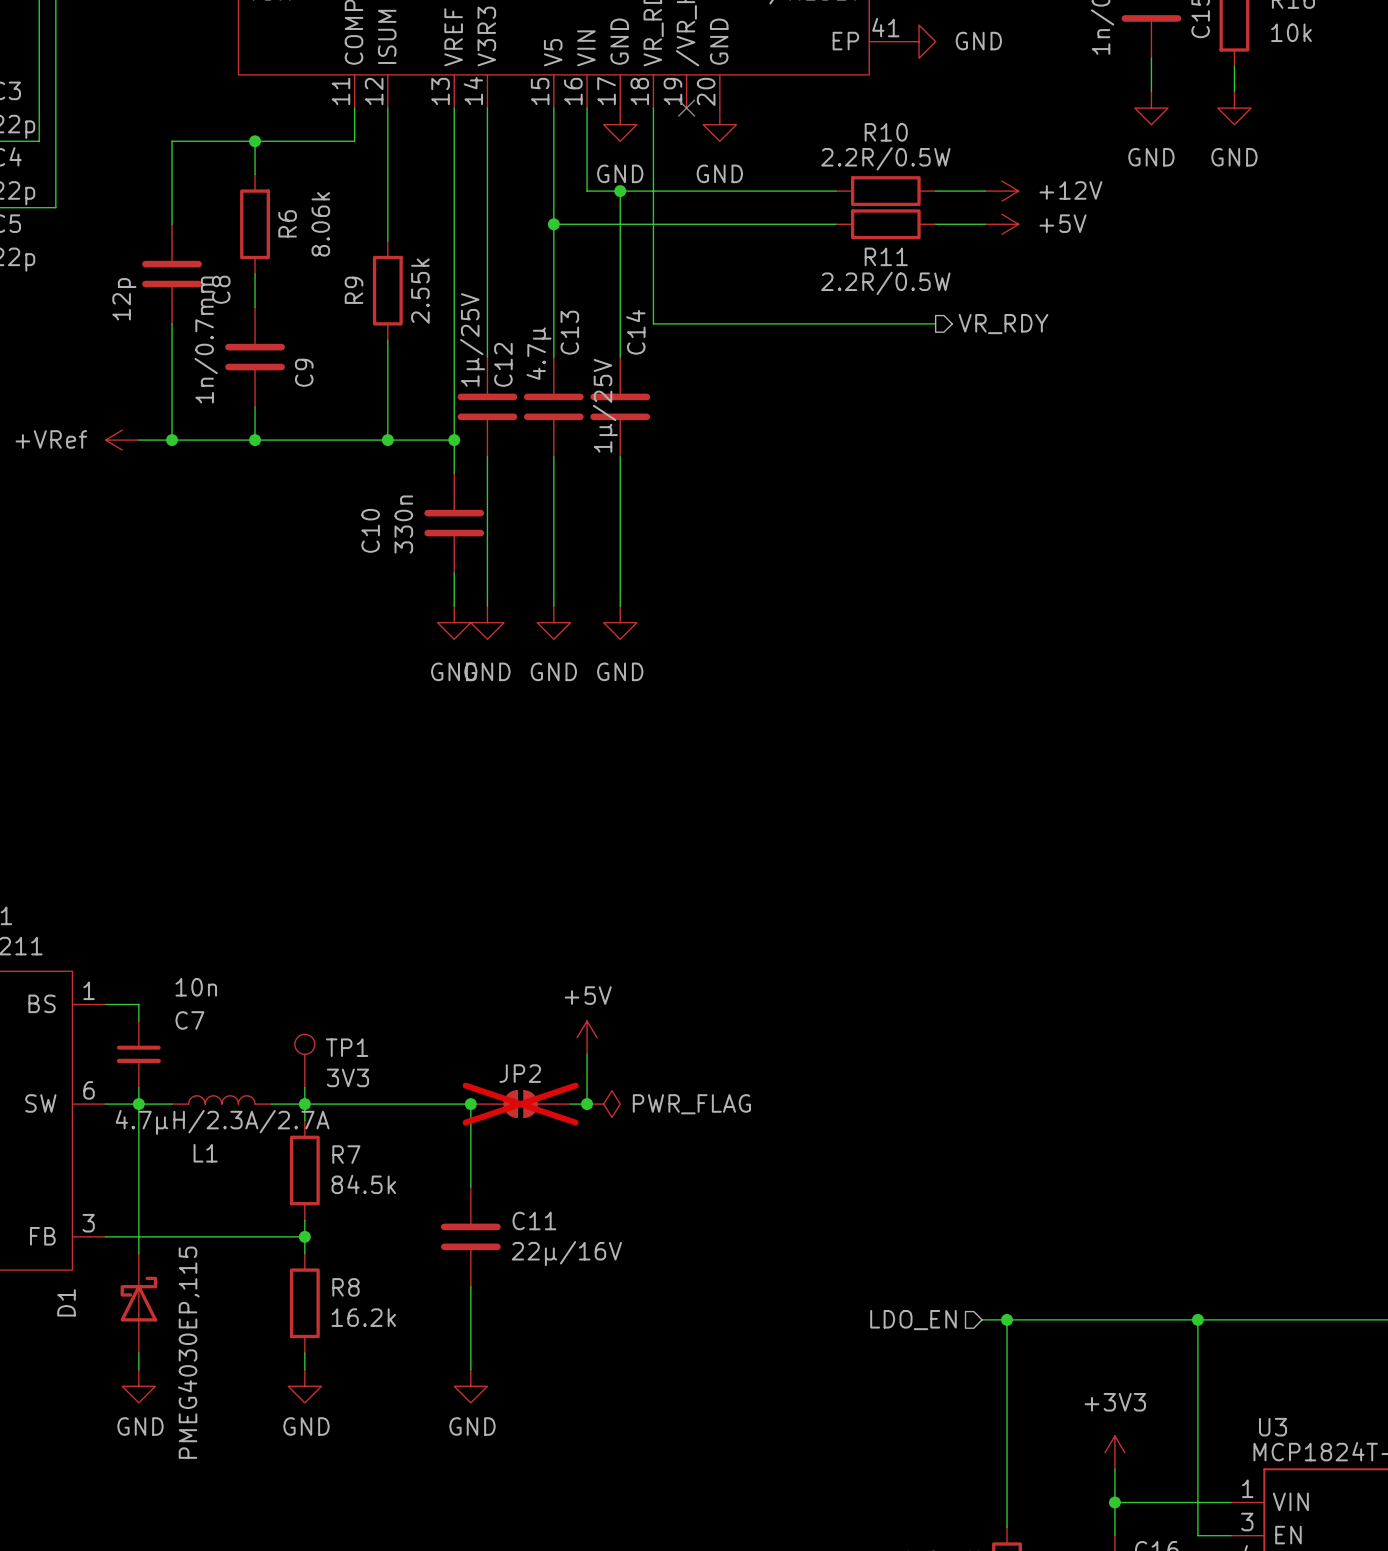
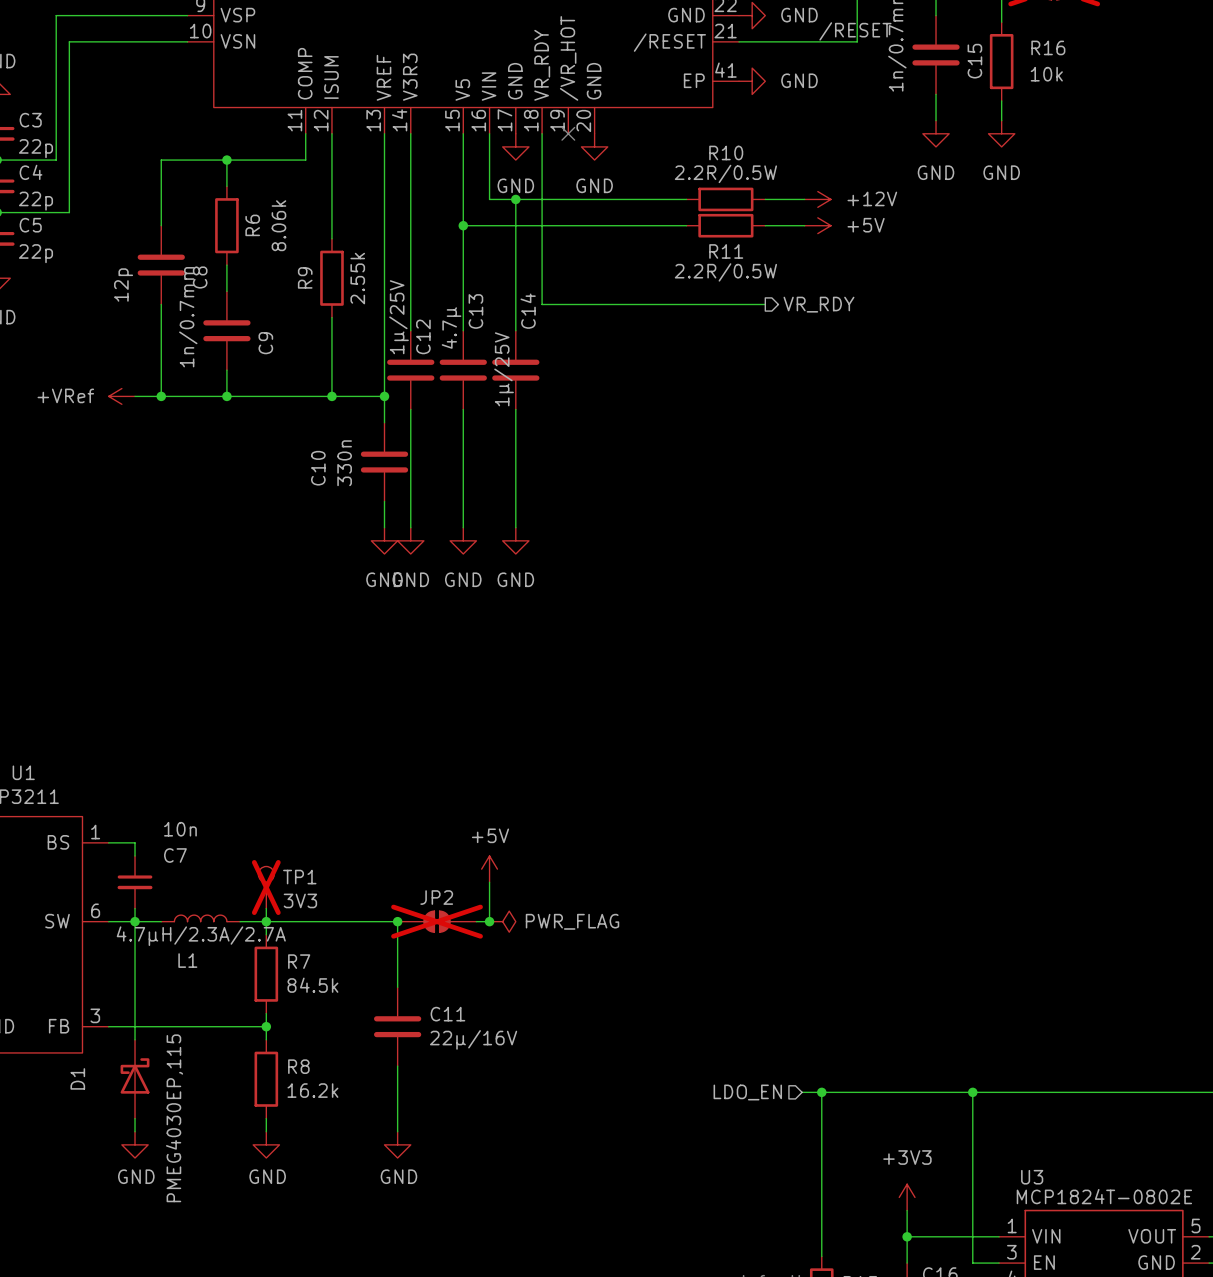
TP1 do-not-place cross: none -> (266, 887)

